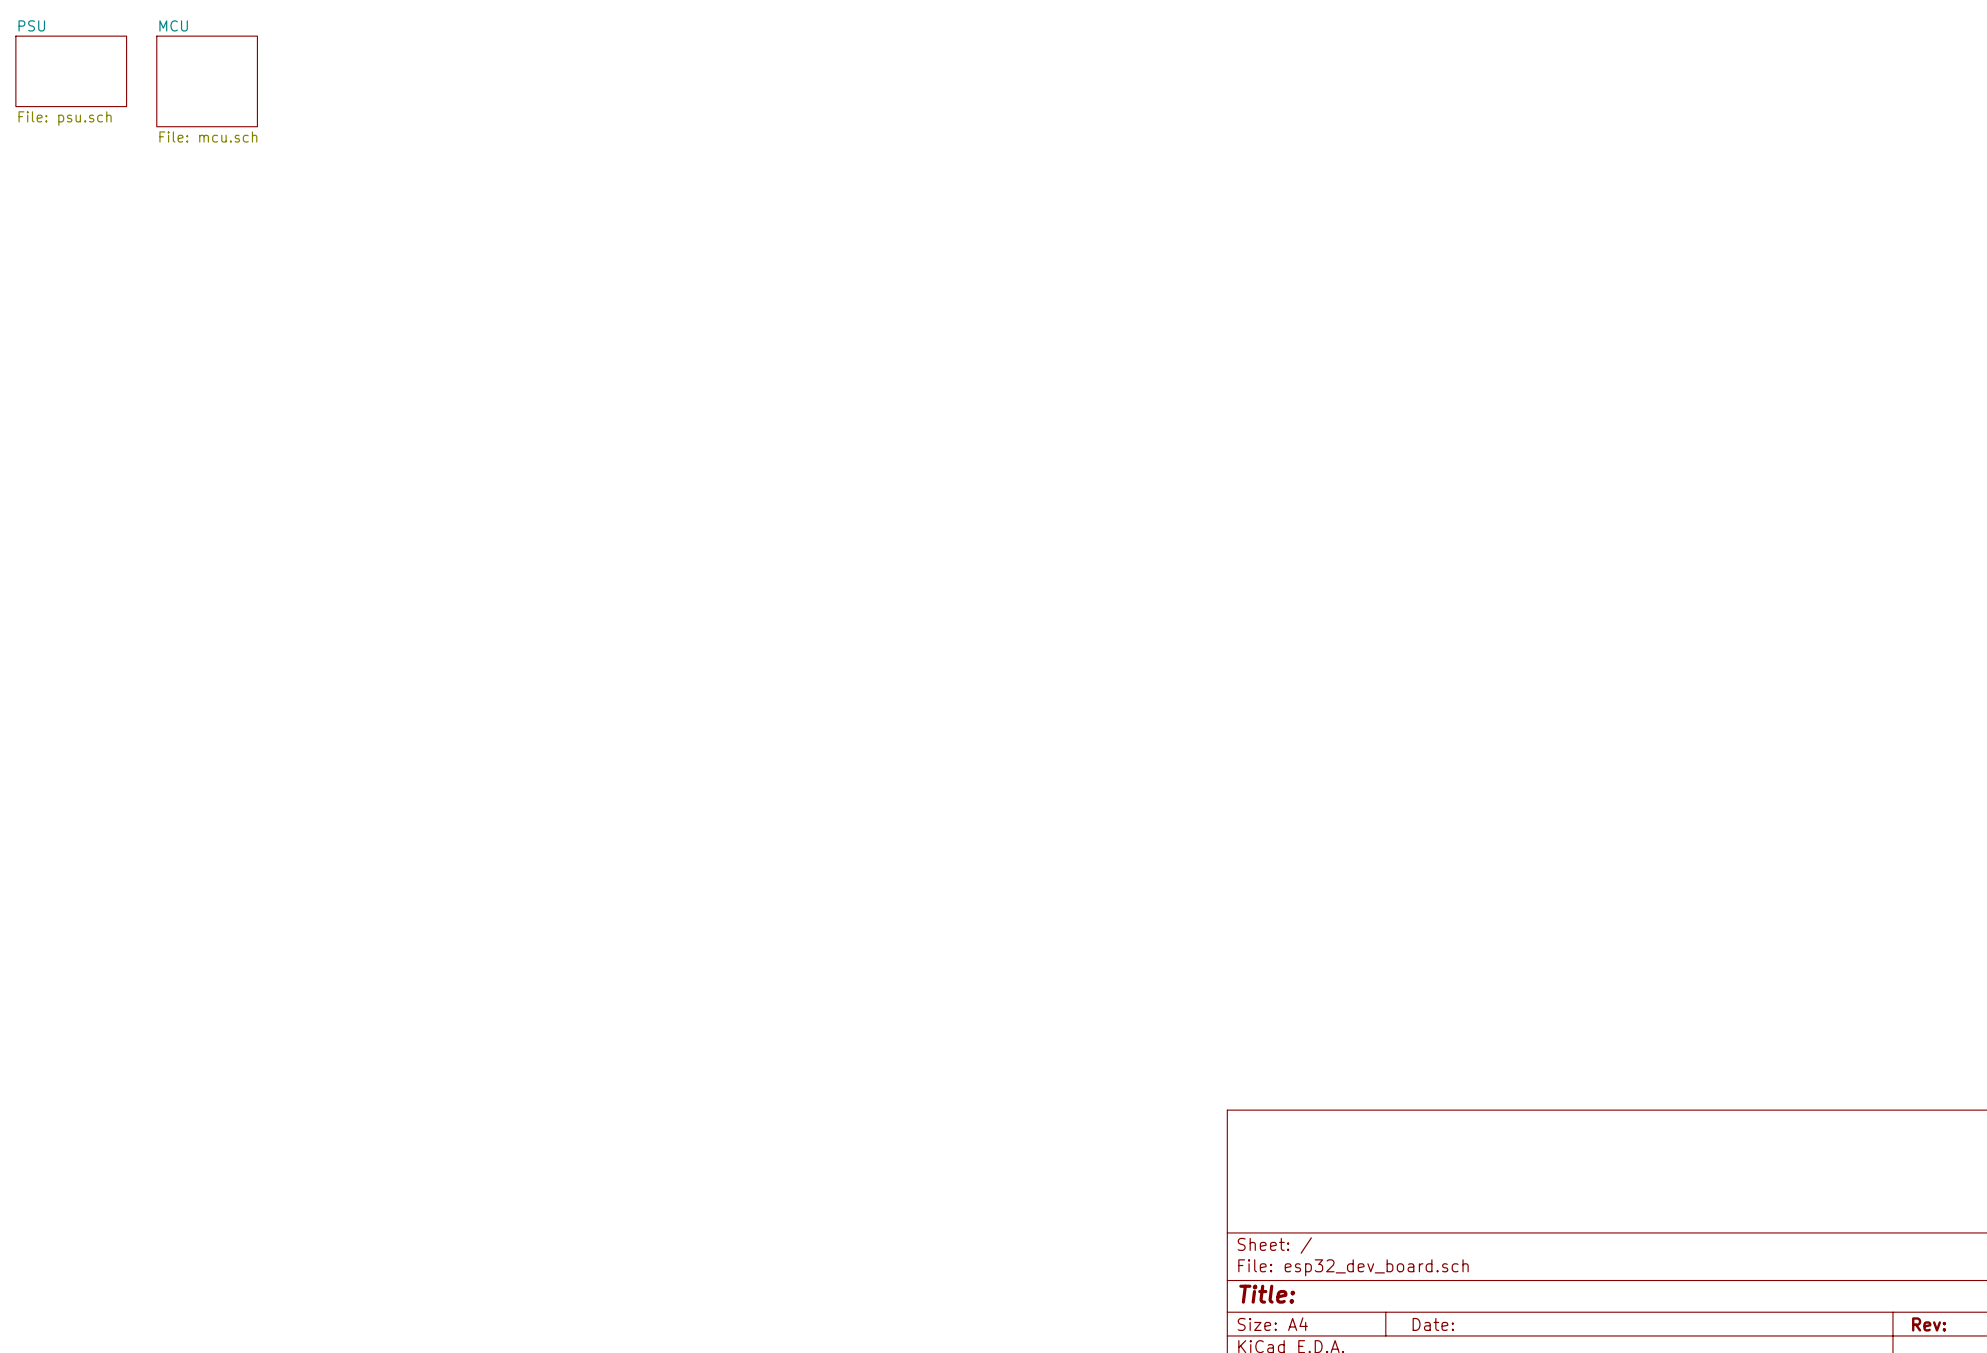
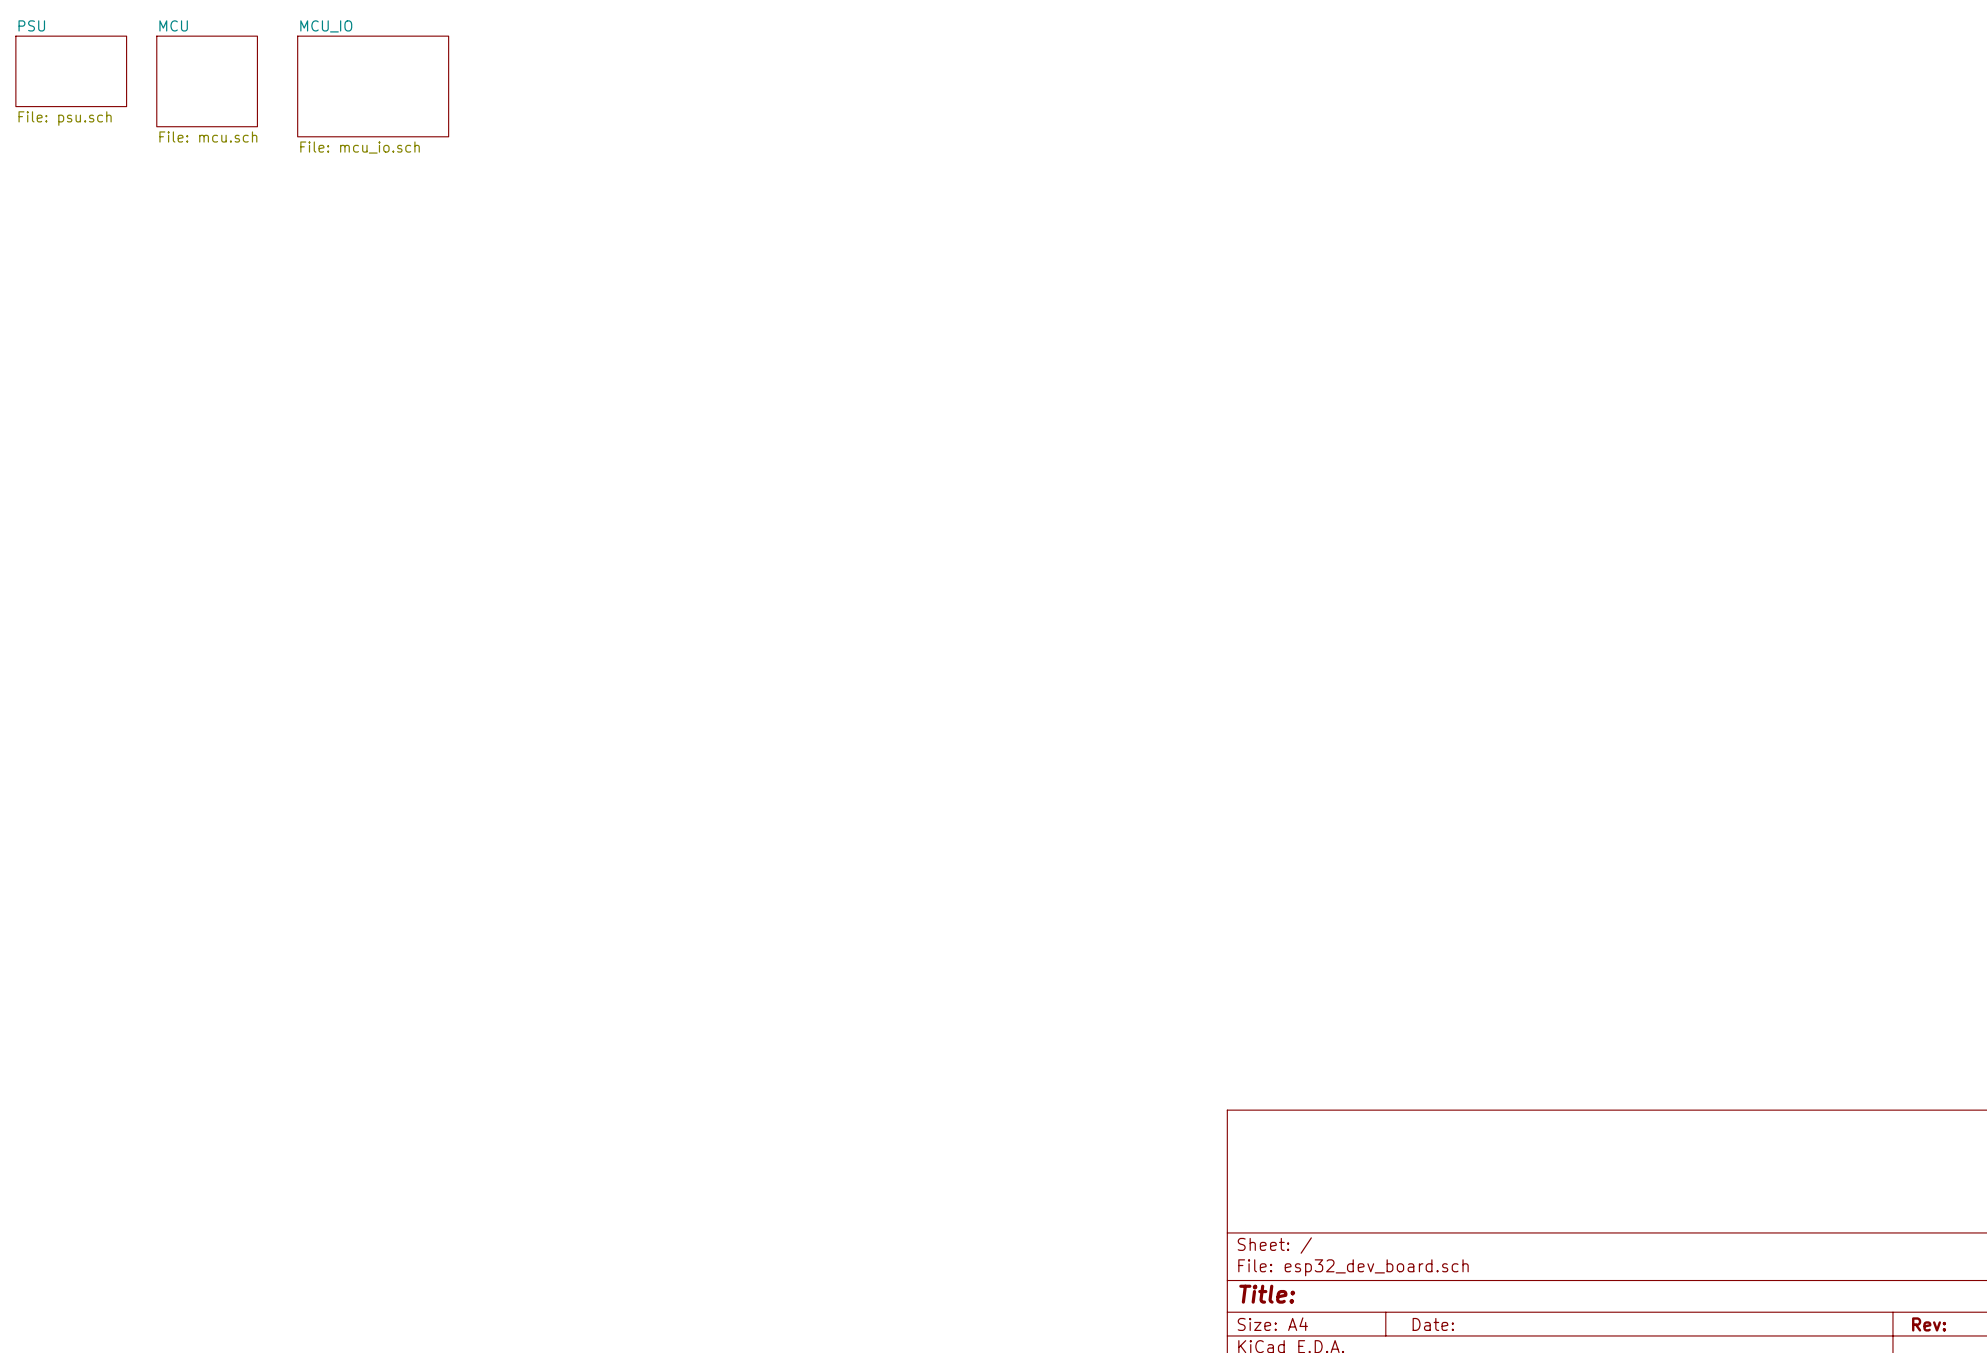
sheet MCU_IO: none -> File: mcu_io.sch (373, 86)

